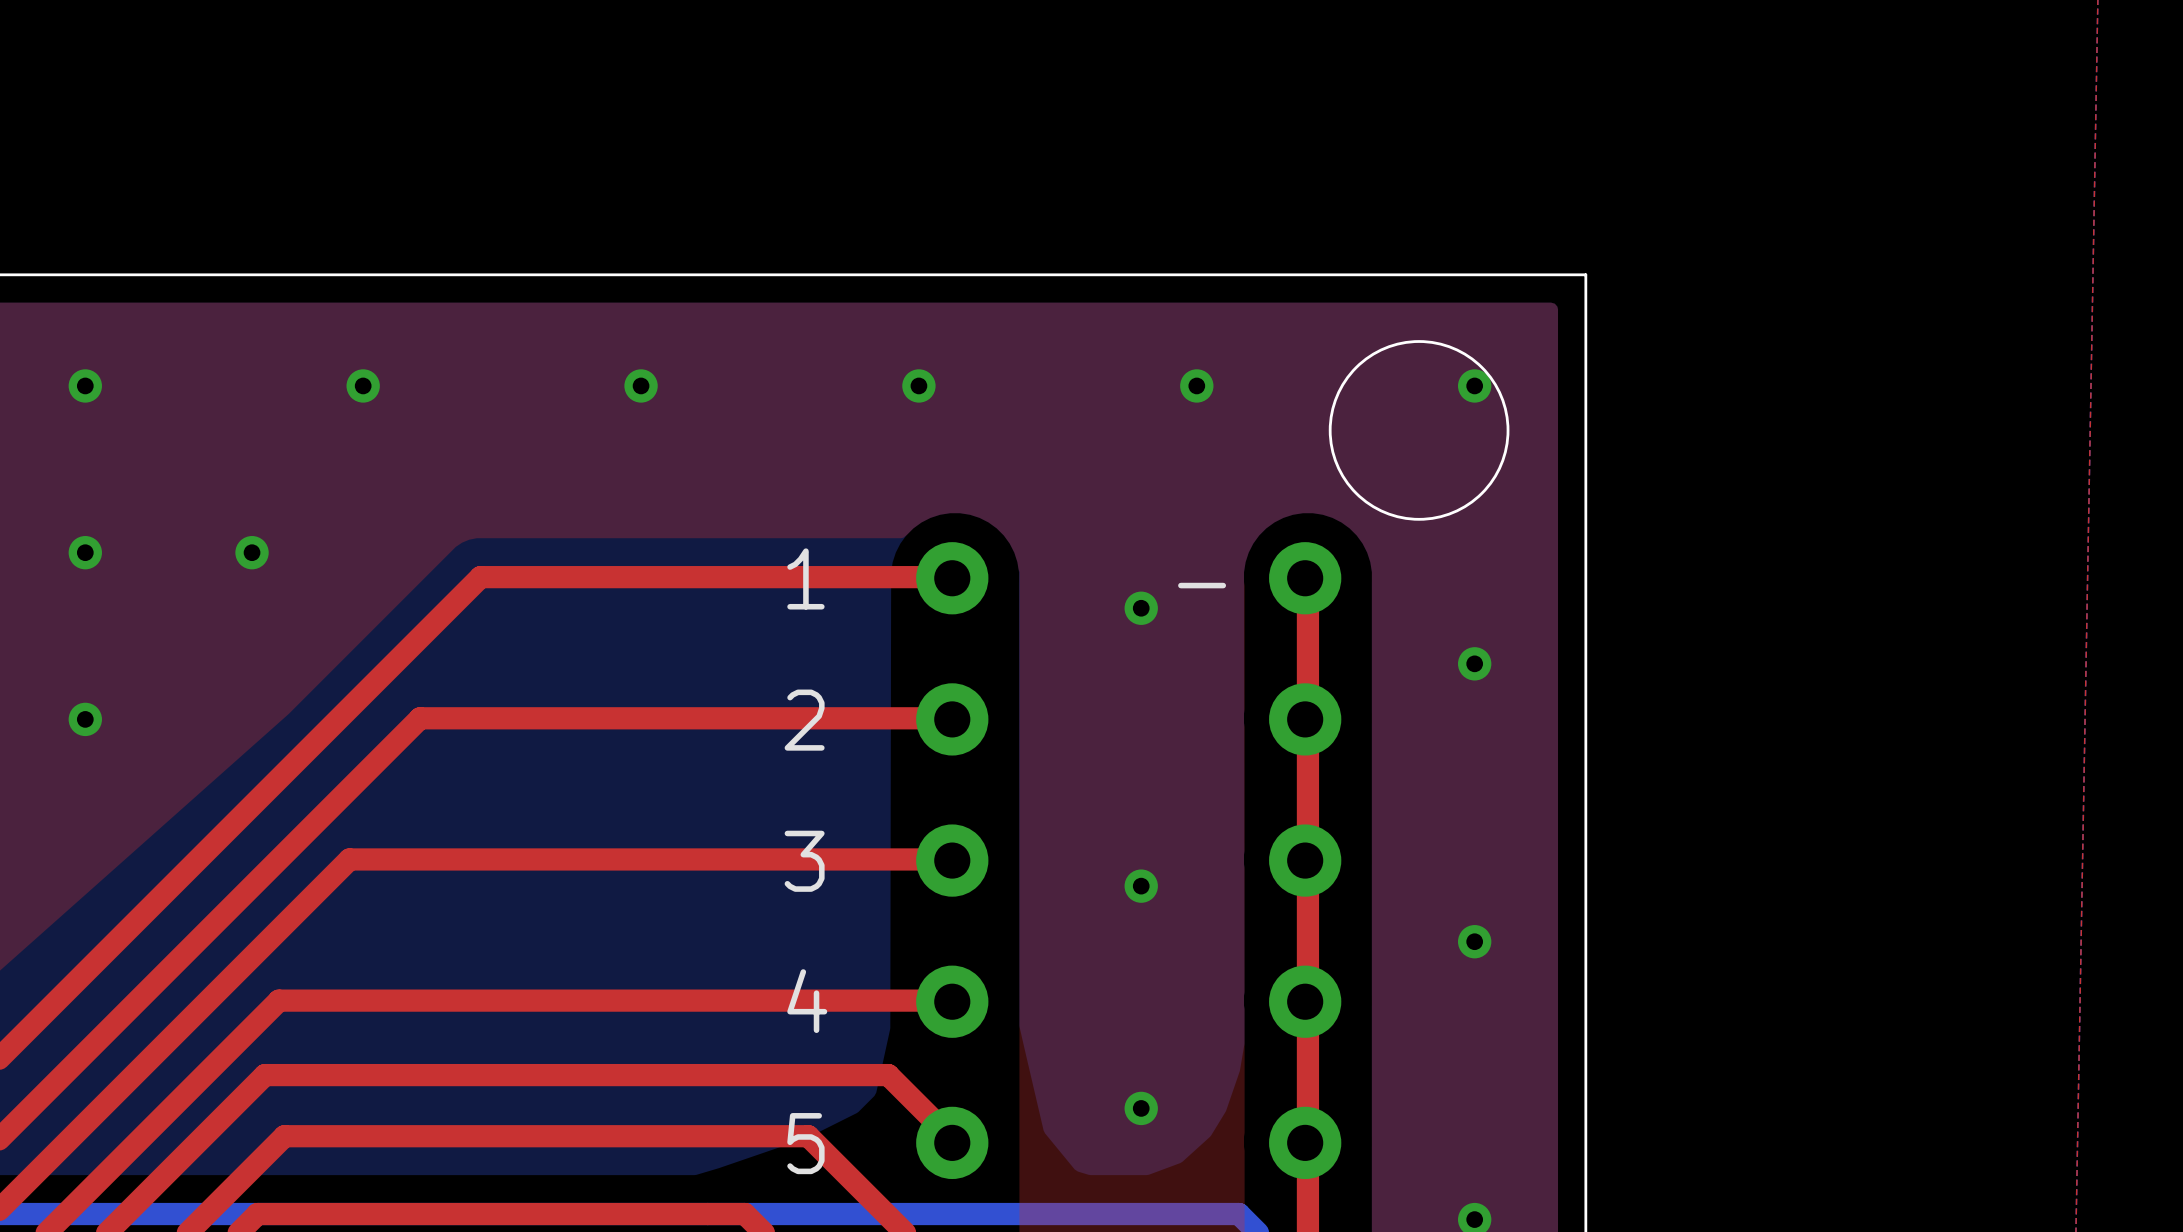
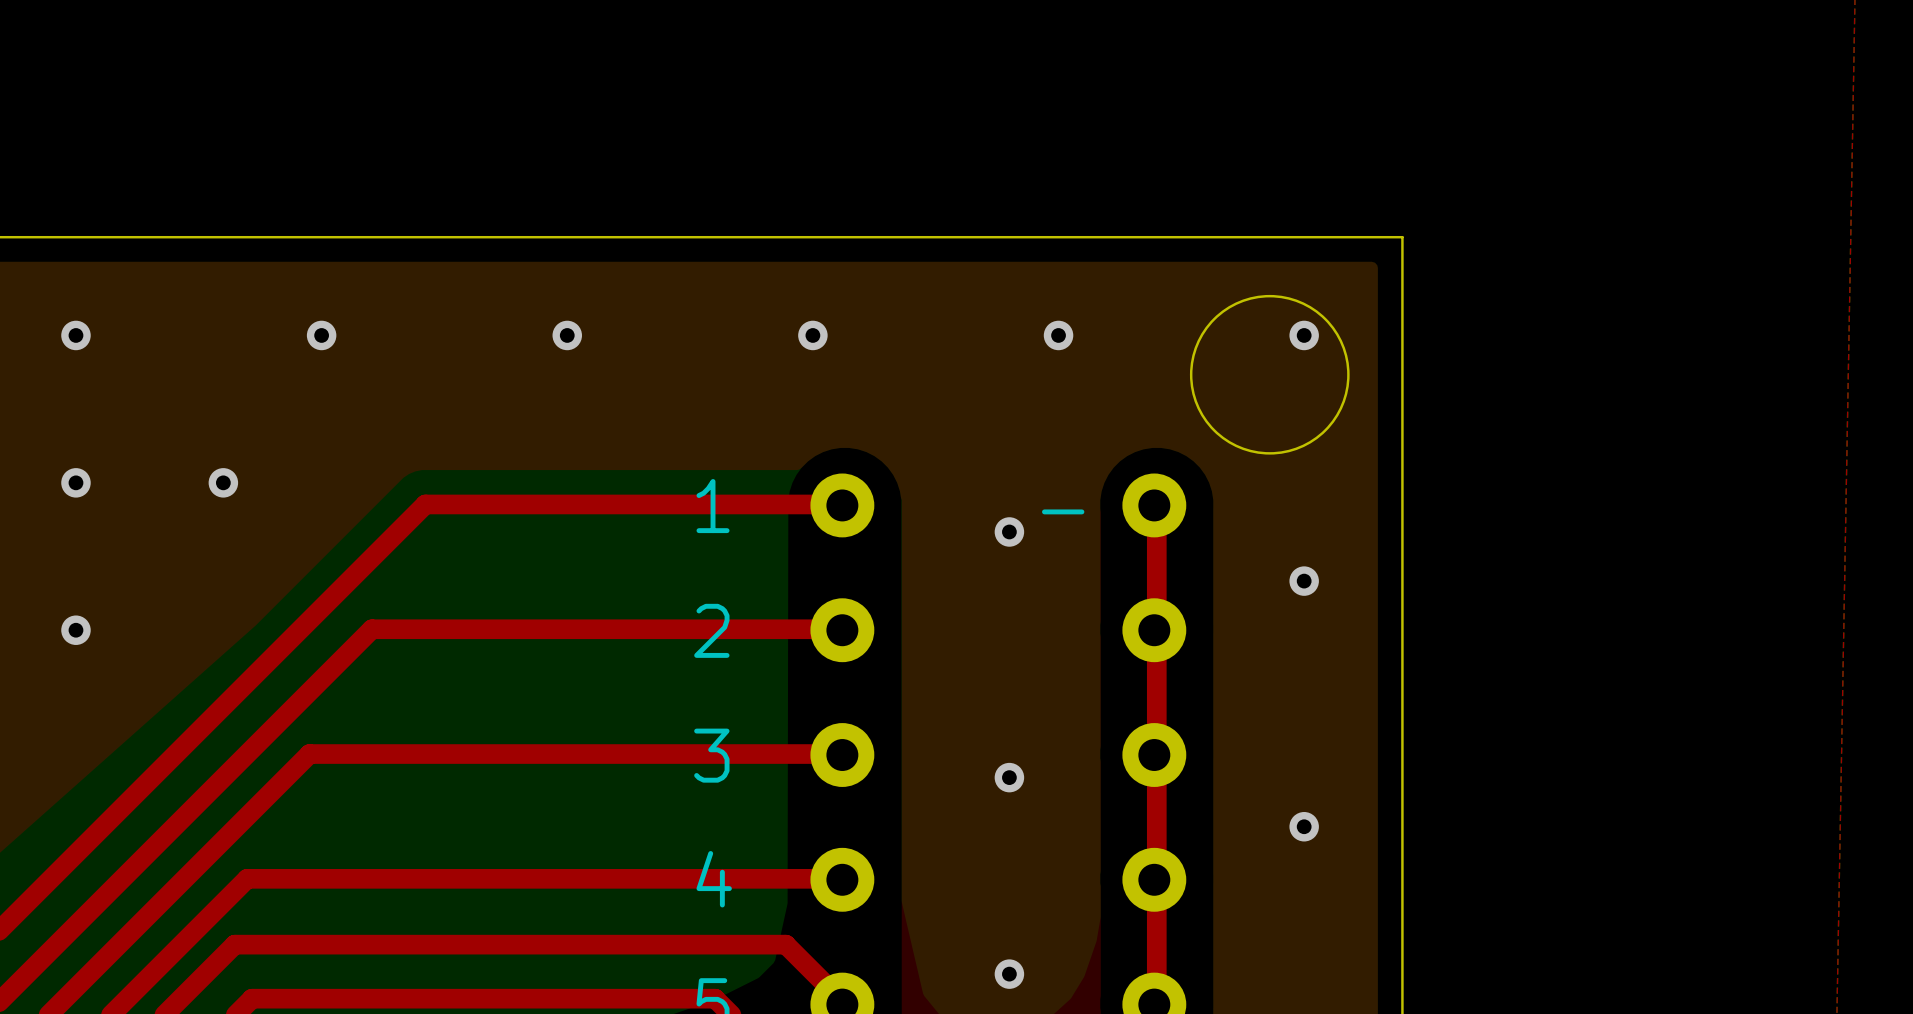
round board edge position: (1419, 430) -> (1269, 374)

